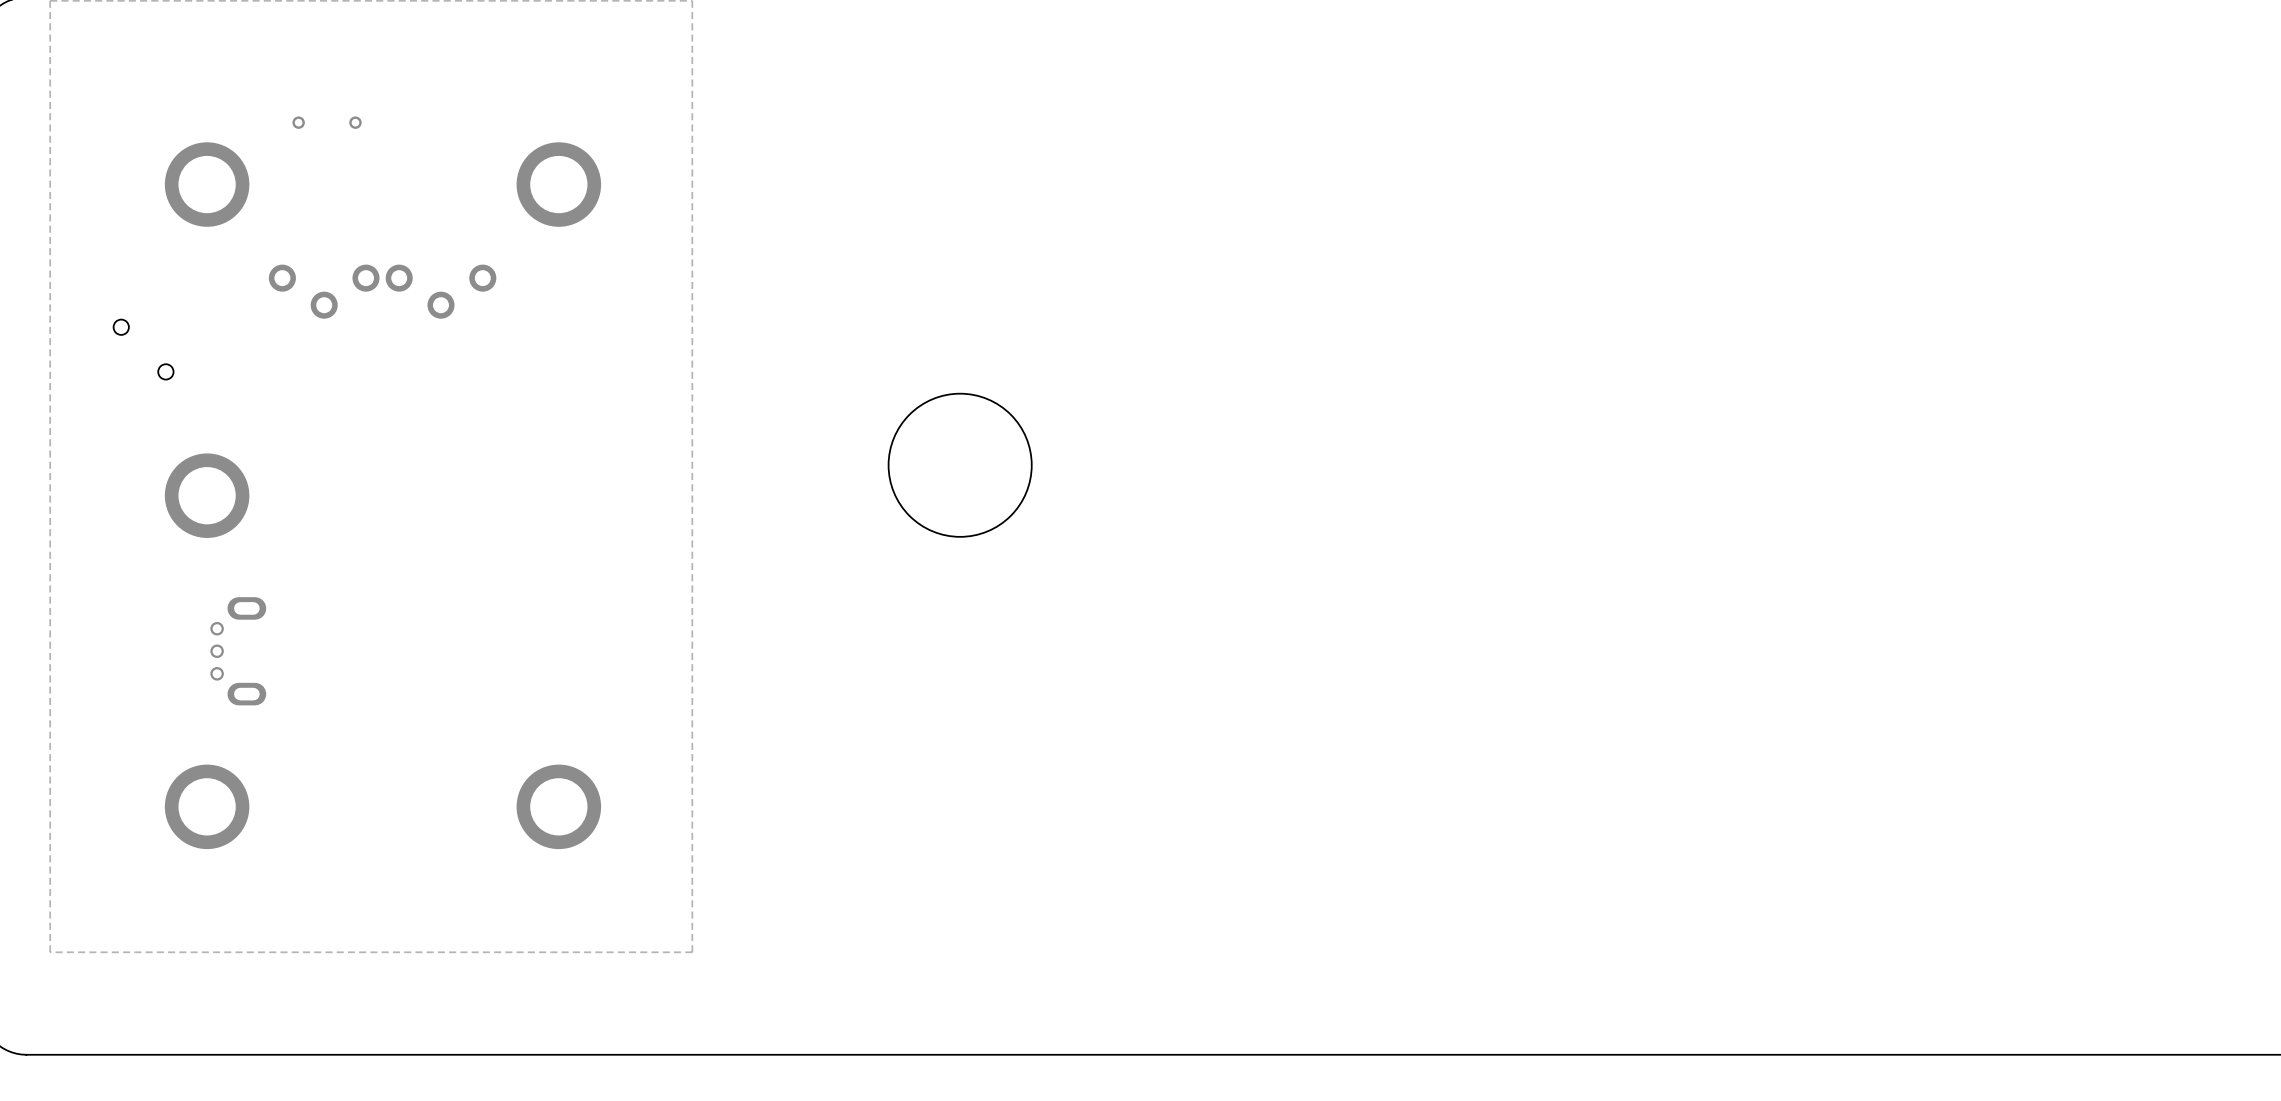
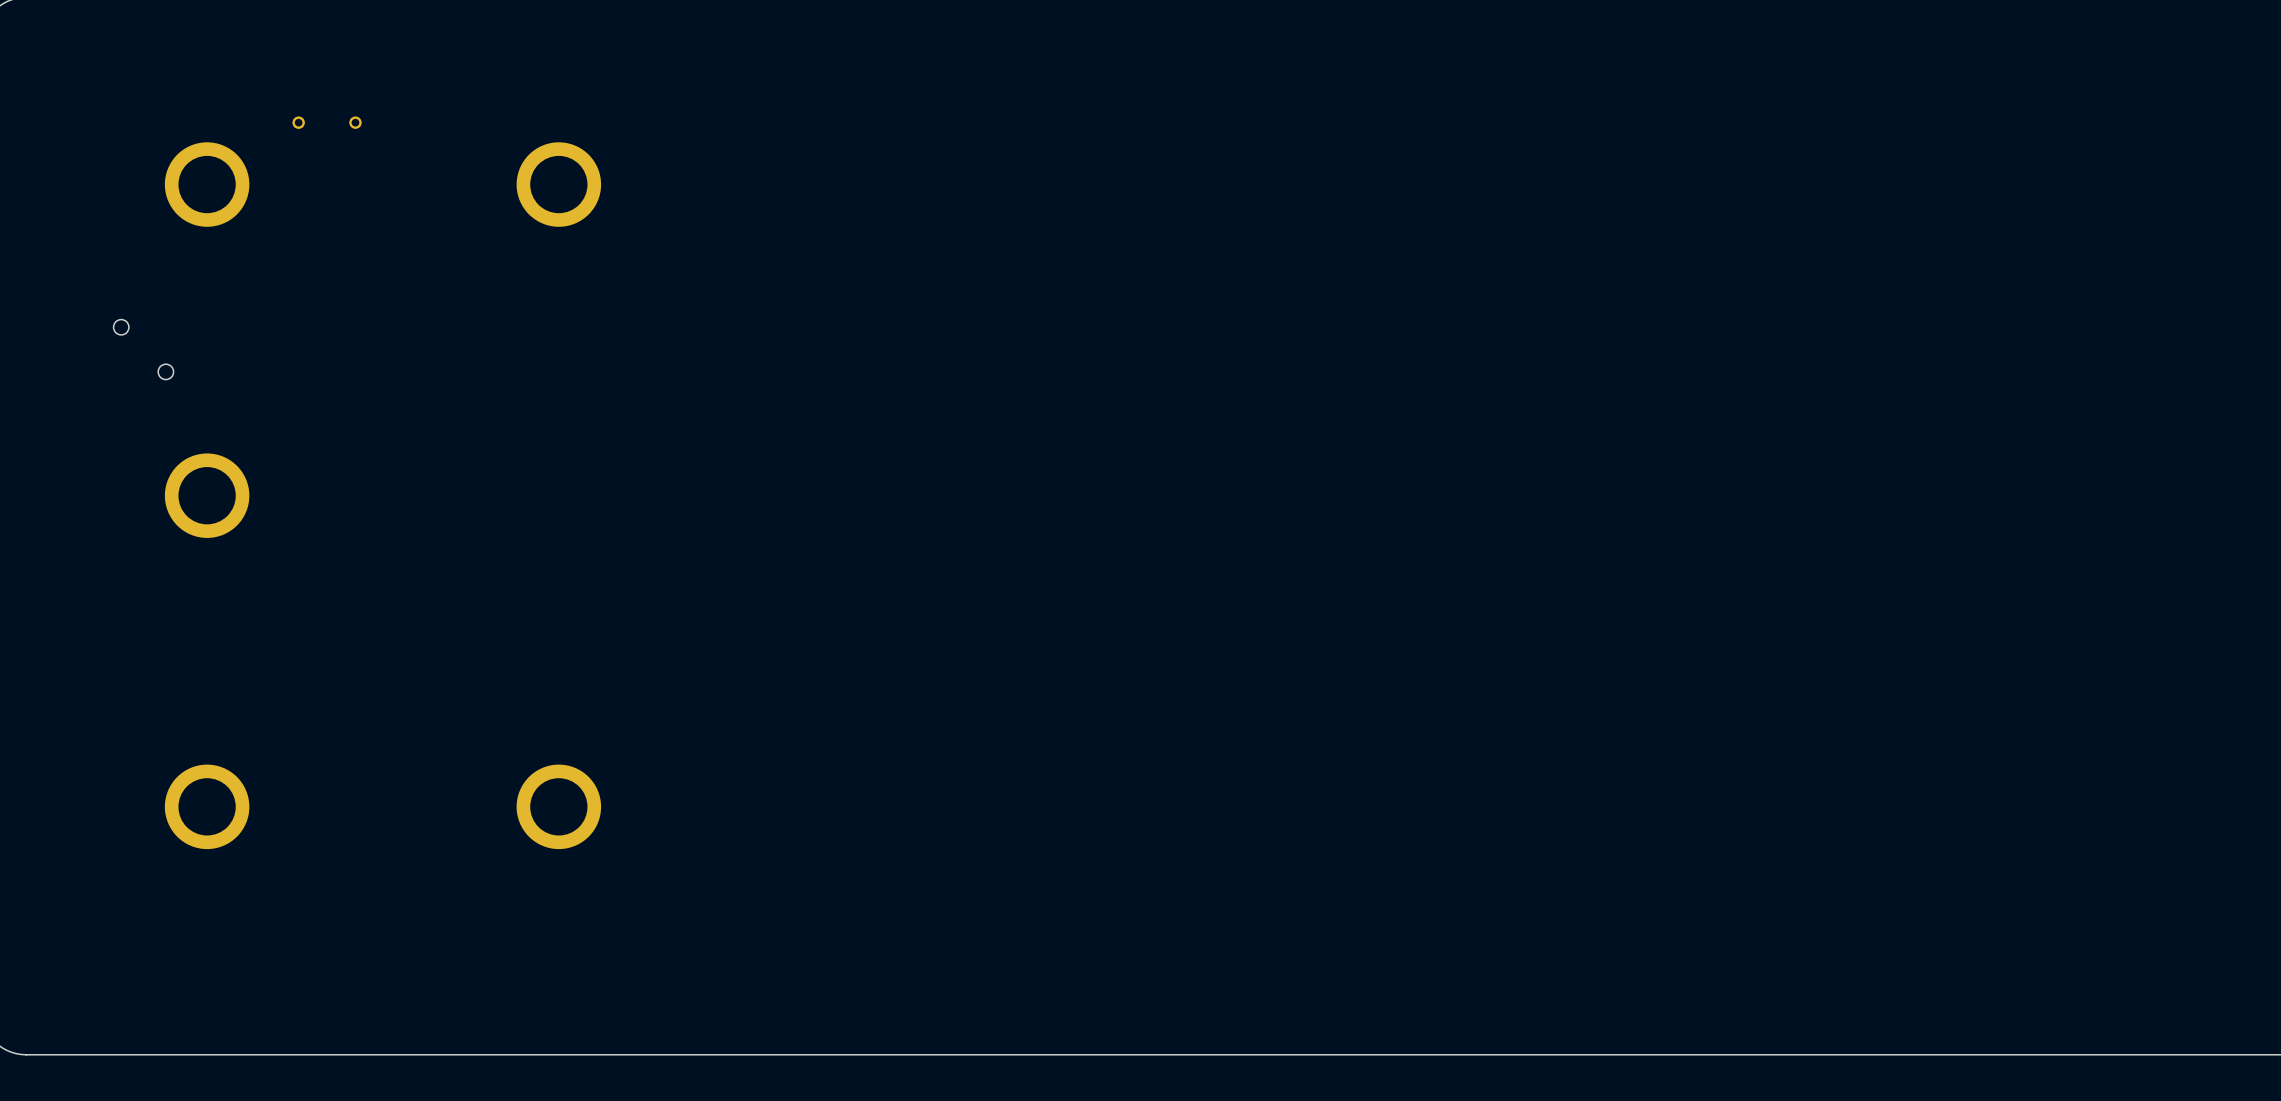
zone outline: (692, 0) (50, 0) (50, 952) (692, 952) (692, 0) -> none
part: (382, 291) -> none
round board edge: [888, 393, 1033, 538] -> none
part: (238, 651) -> none

